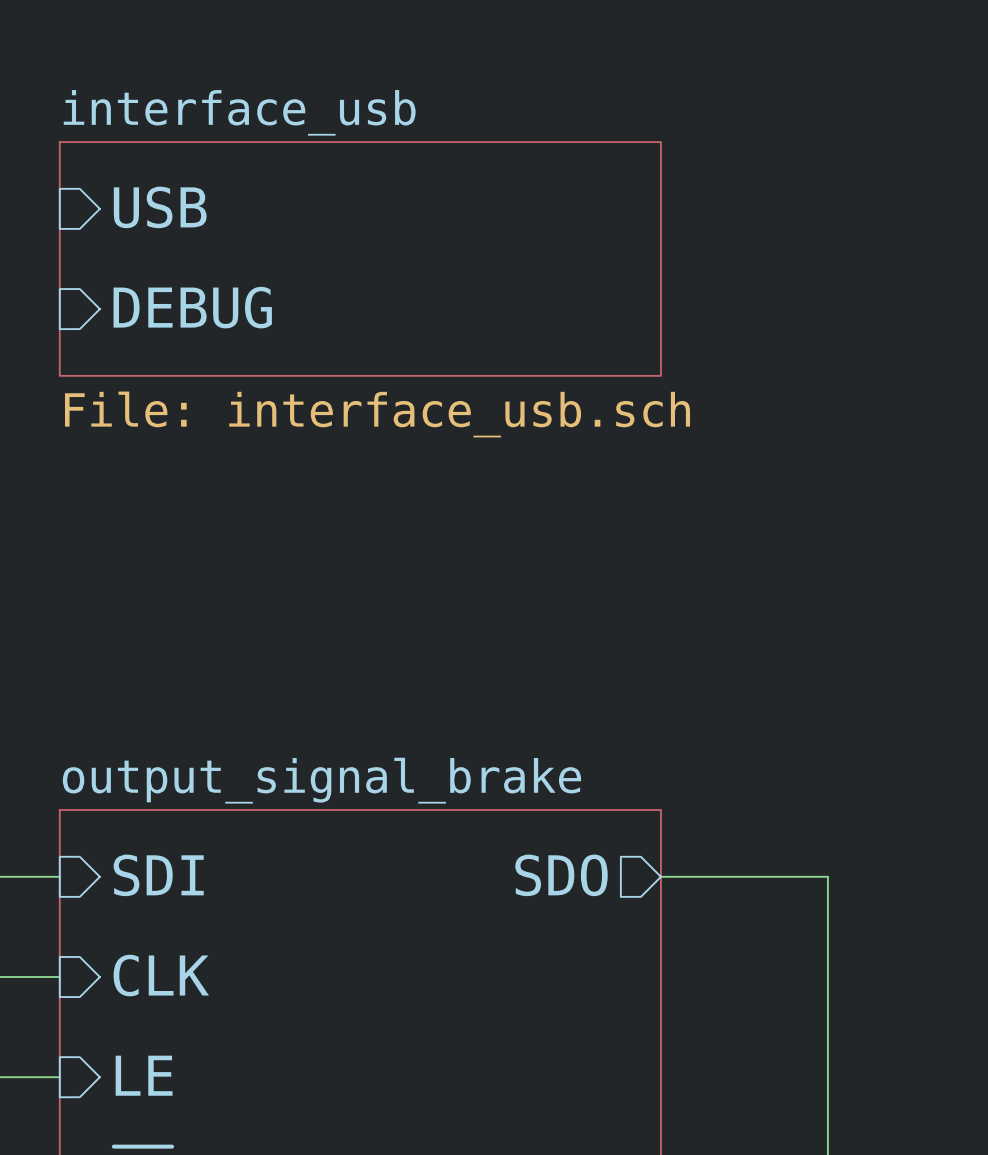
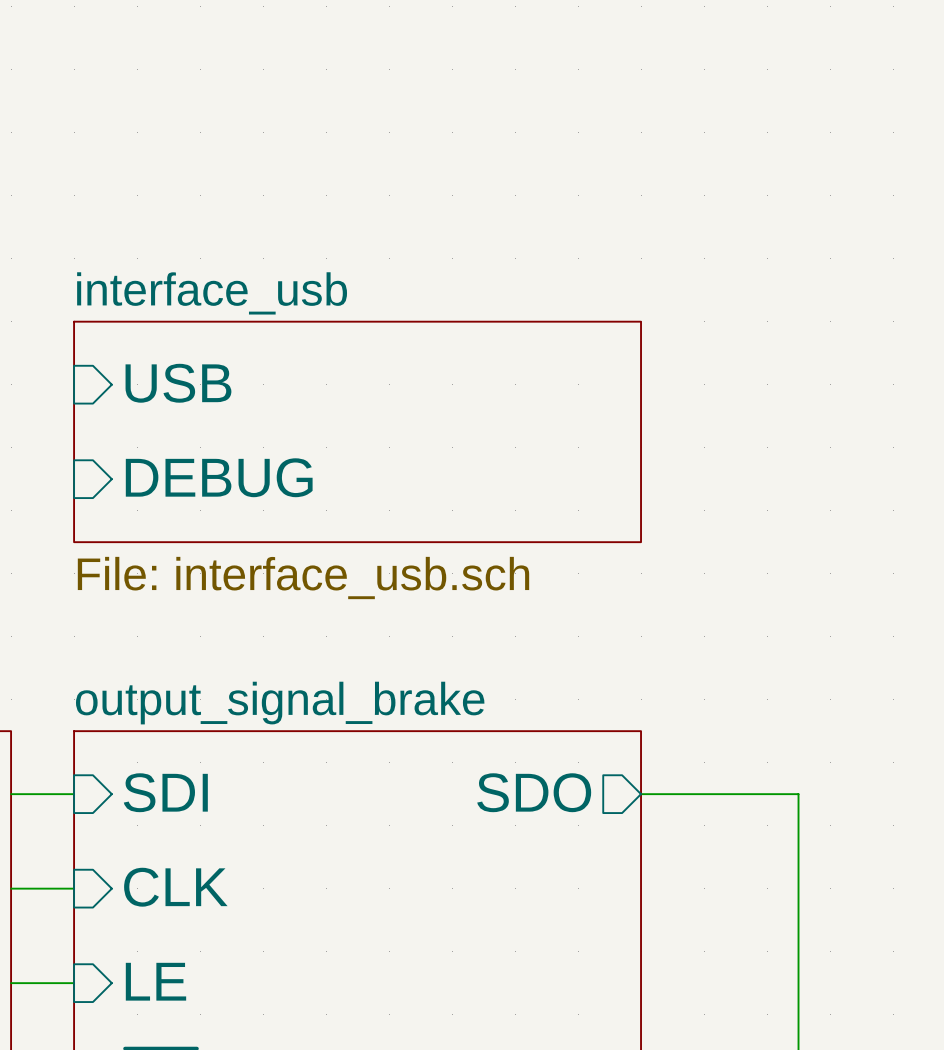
sheet pin position: USB (160, 207) -> USB (178, 383)
sheet interface_usb position: (360, 258) -> (357, 431)
sheet pin position: DEBUG (192, 307) -> DEBUG (219, 477)

